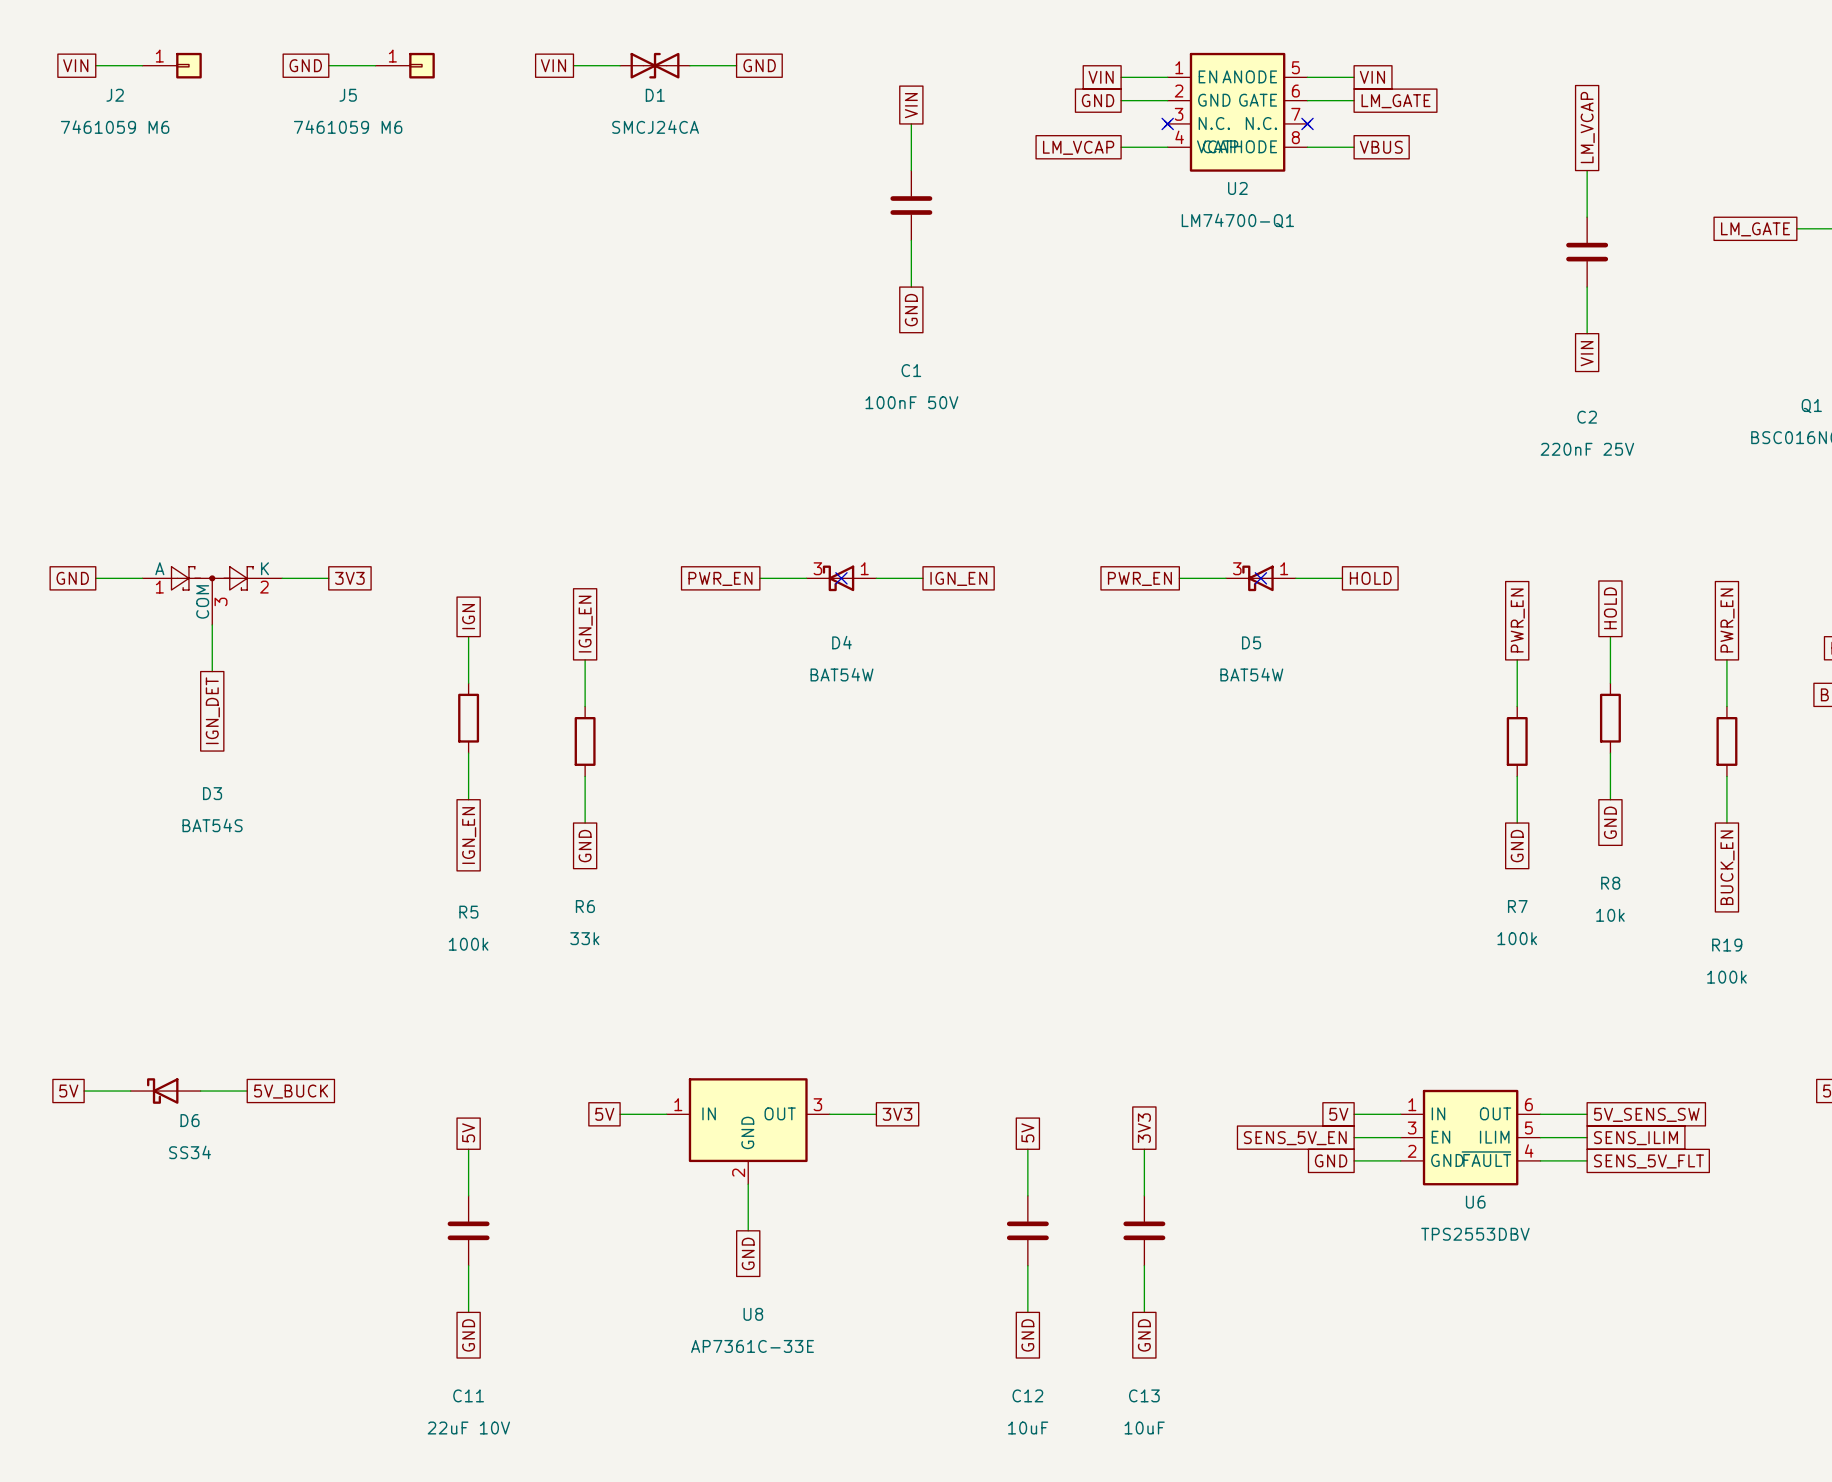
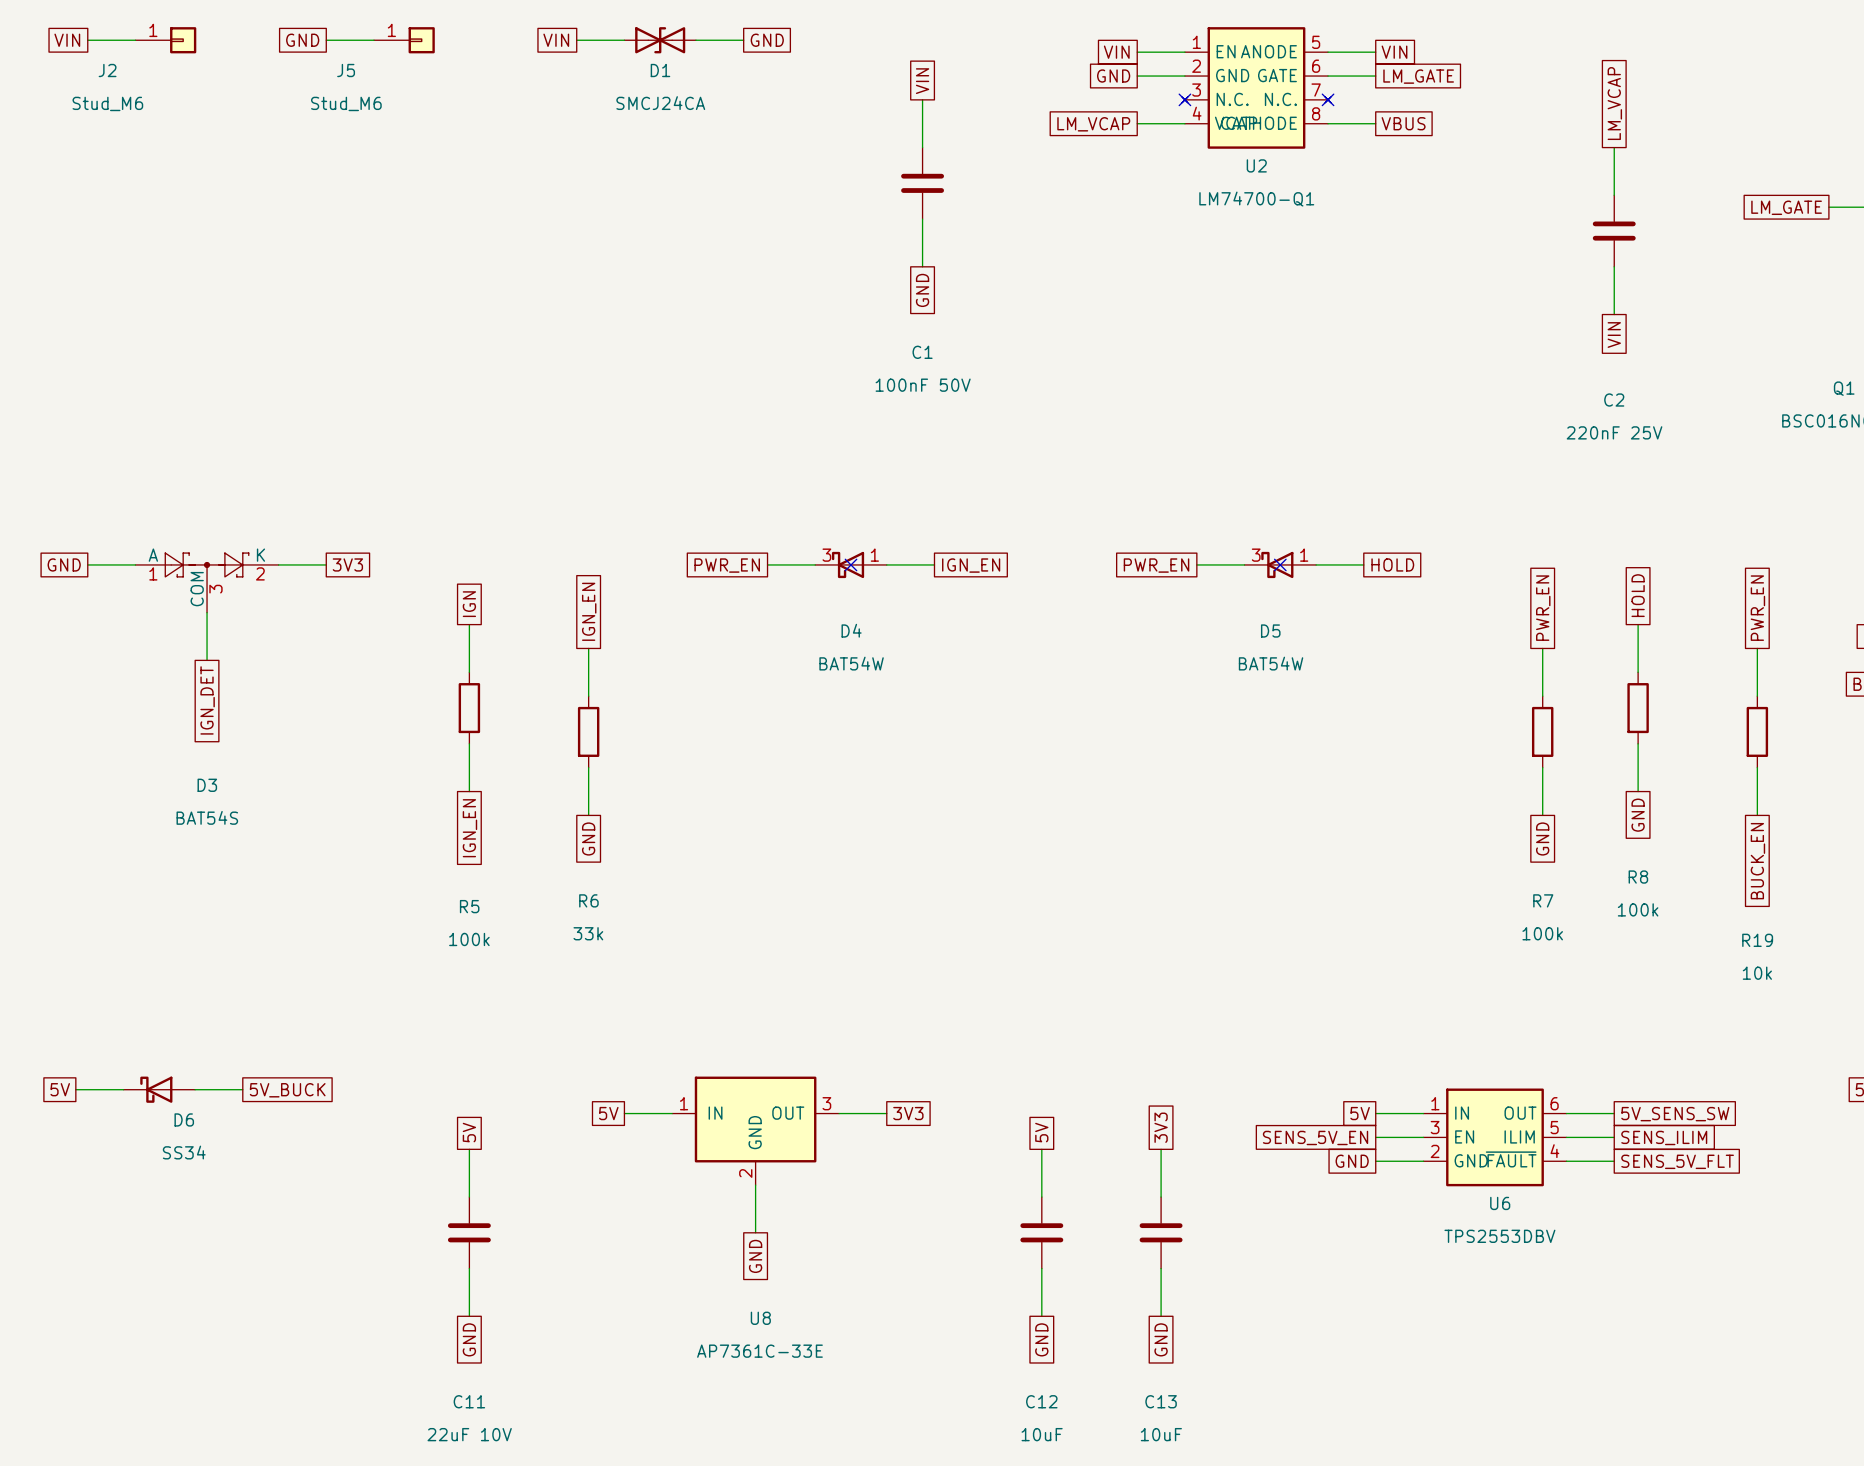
J2 value: 7461059 M6 (115, 127) -> Stud_M6 (107, 103)
J5 value: 7461059 M6 (348, 127) -> Stud_M6 (346, 103)
R8 value: 10k (1610, 915) -> 100k (1638, 909)
R19 value: 100k (1726, 977) -> 10k (1757, 973)

